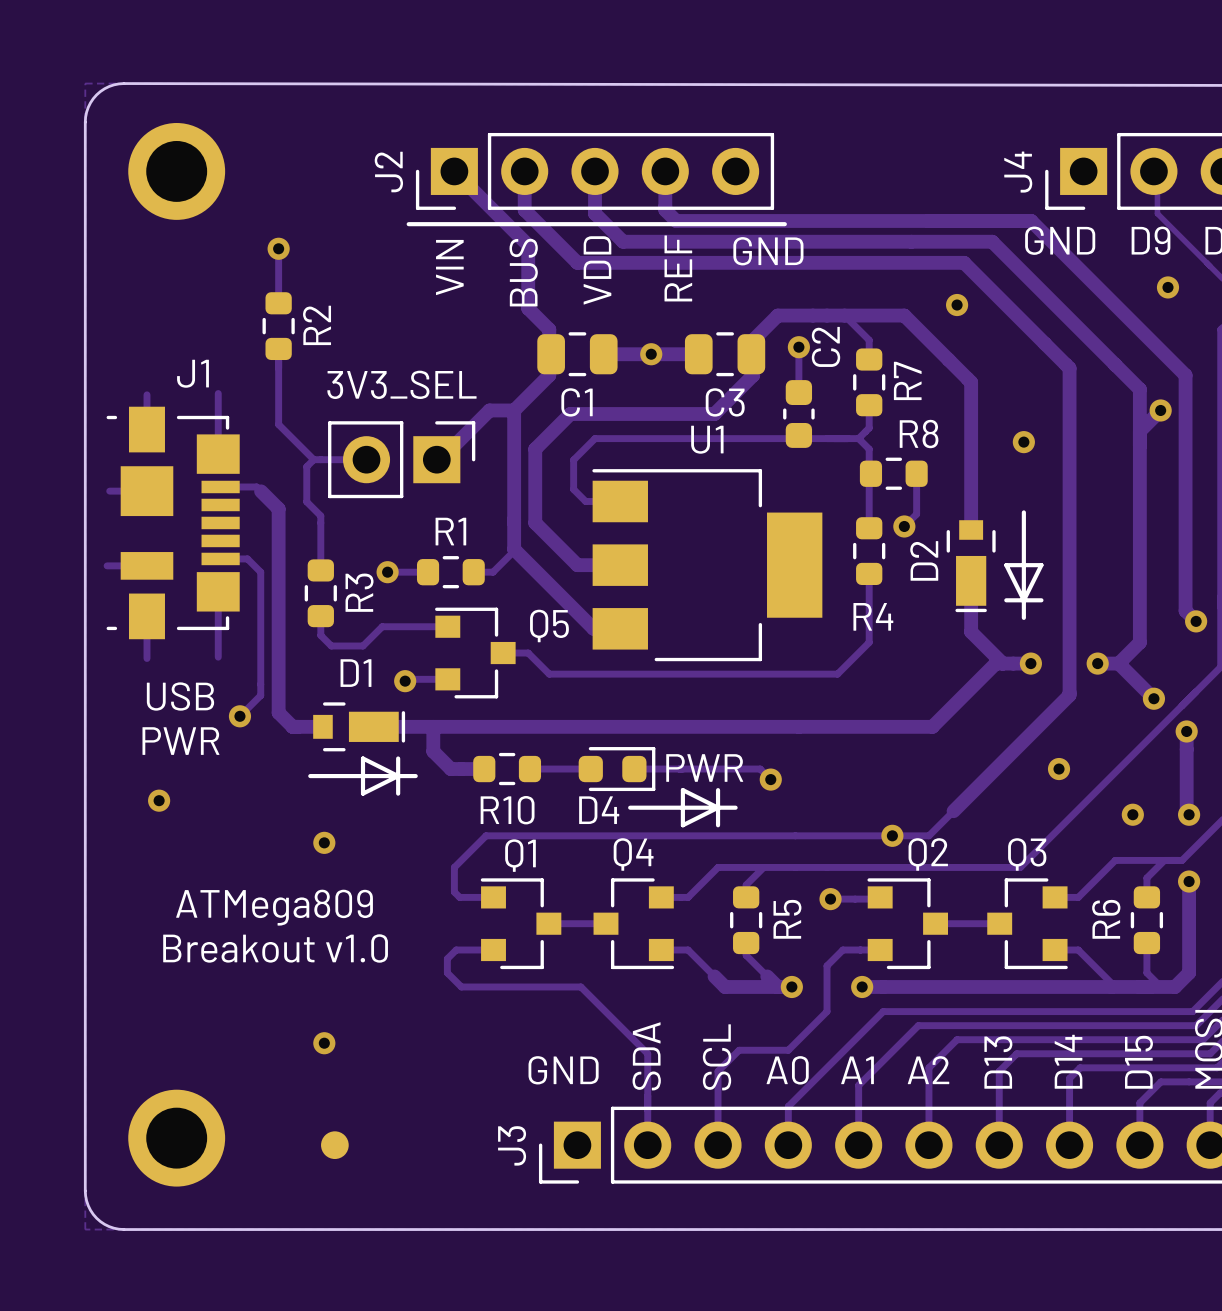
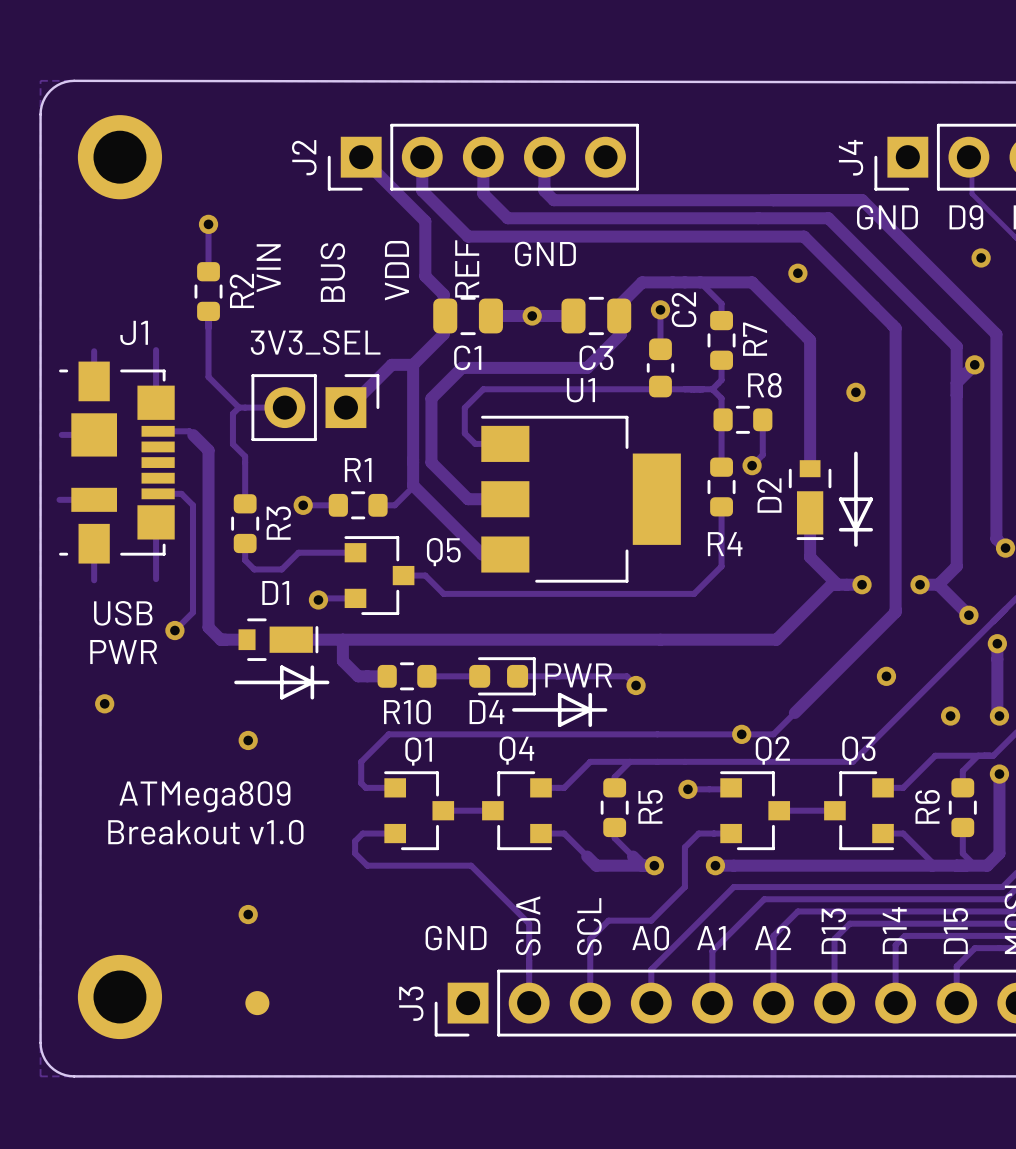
line: (408, 224) (784, 224) -> none
text position: GND (768, 251) -> GND (545, 254)
text position: VIN (449, 267) -> VIN (268, 268)
text position: REF (678, 268) -> REF (467, 268)
text position: VDD (597, 270) -> VDD (396, 270)
text position: BUS (523, 272) -> BUS (332, 272)

